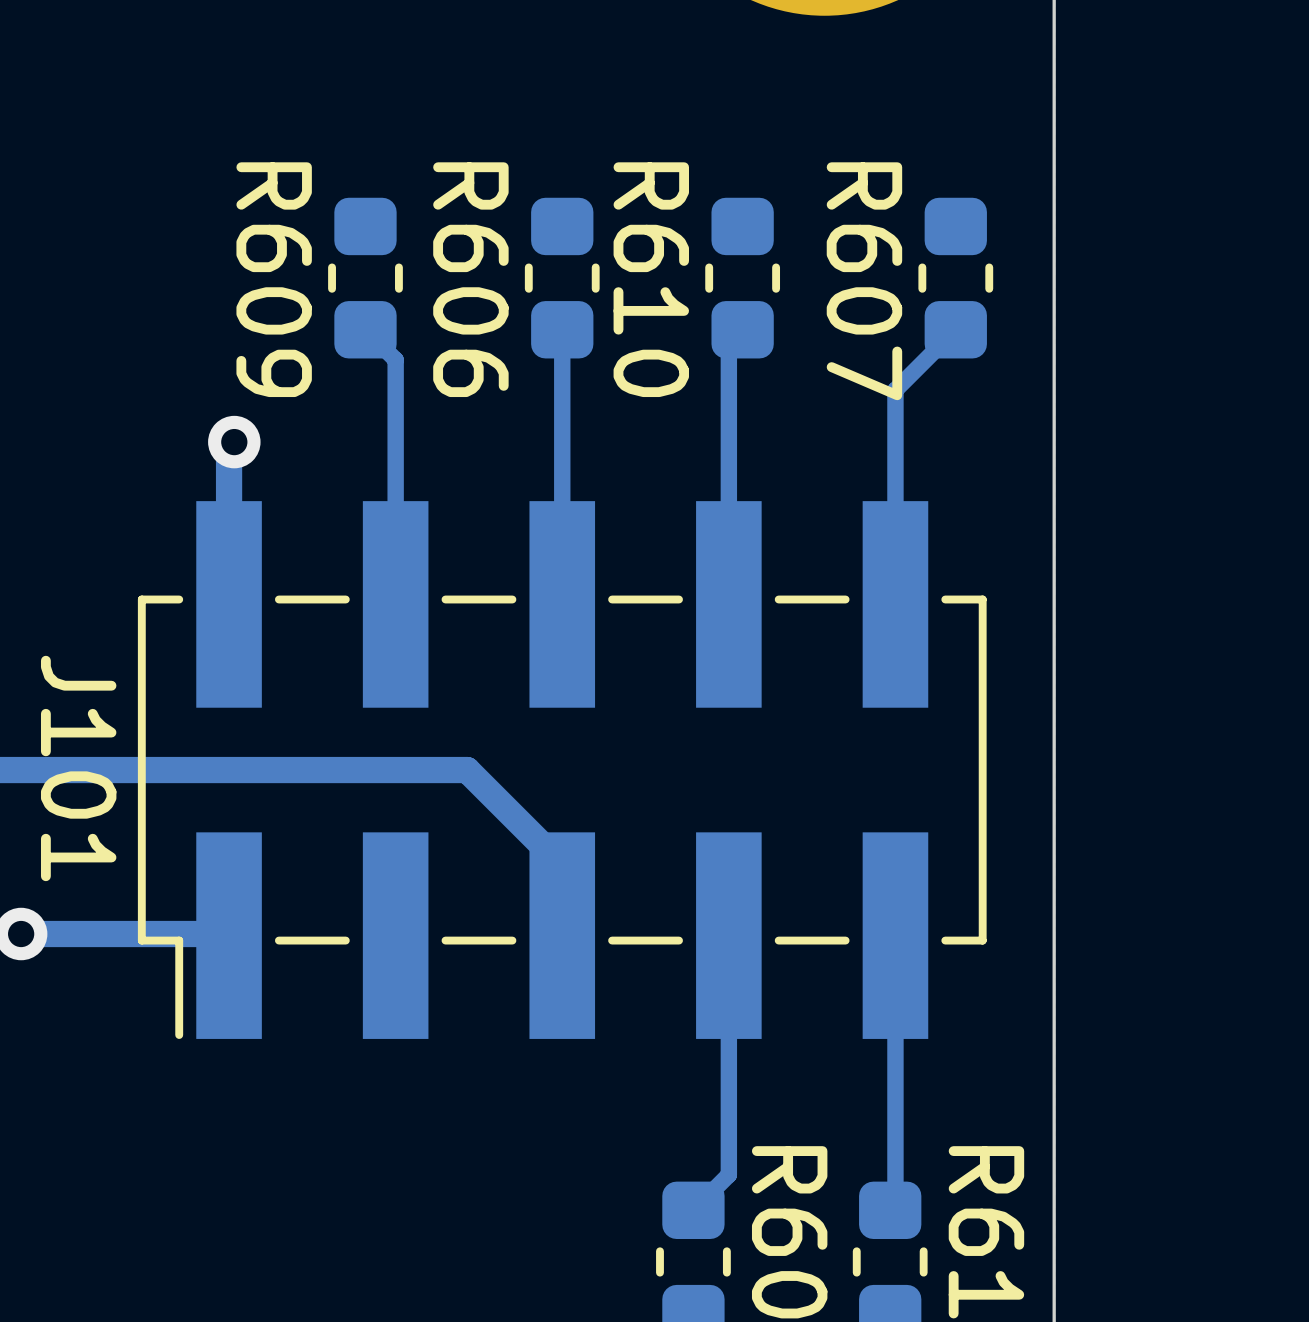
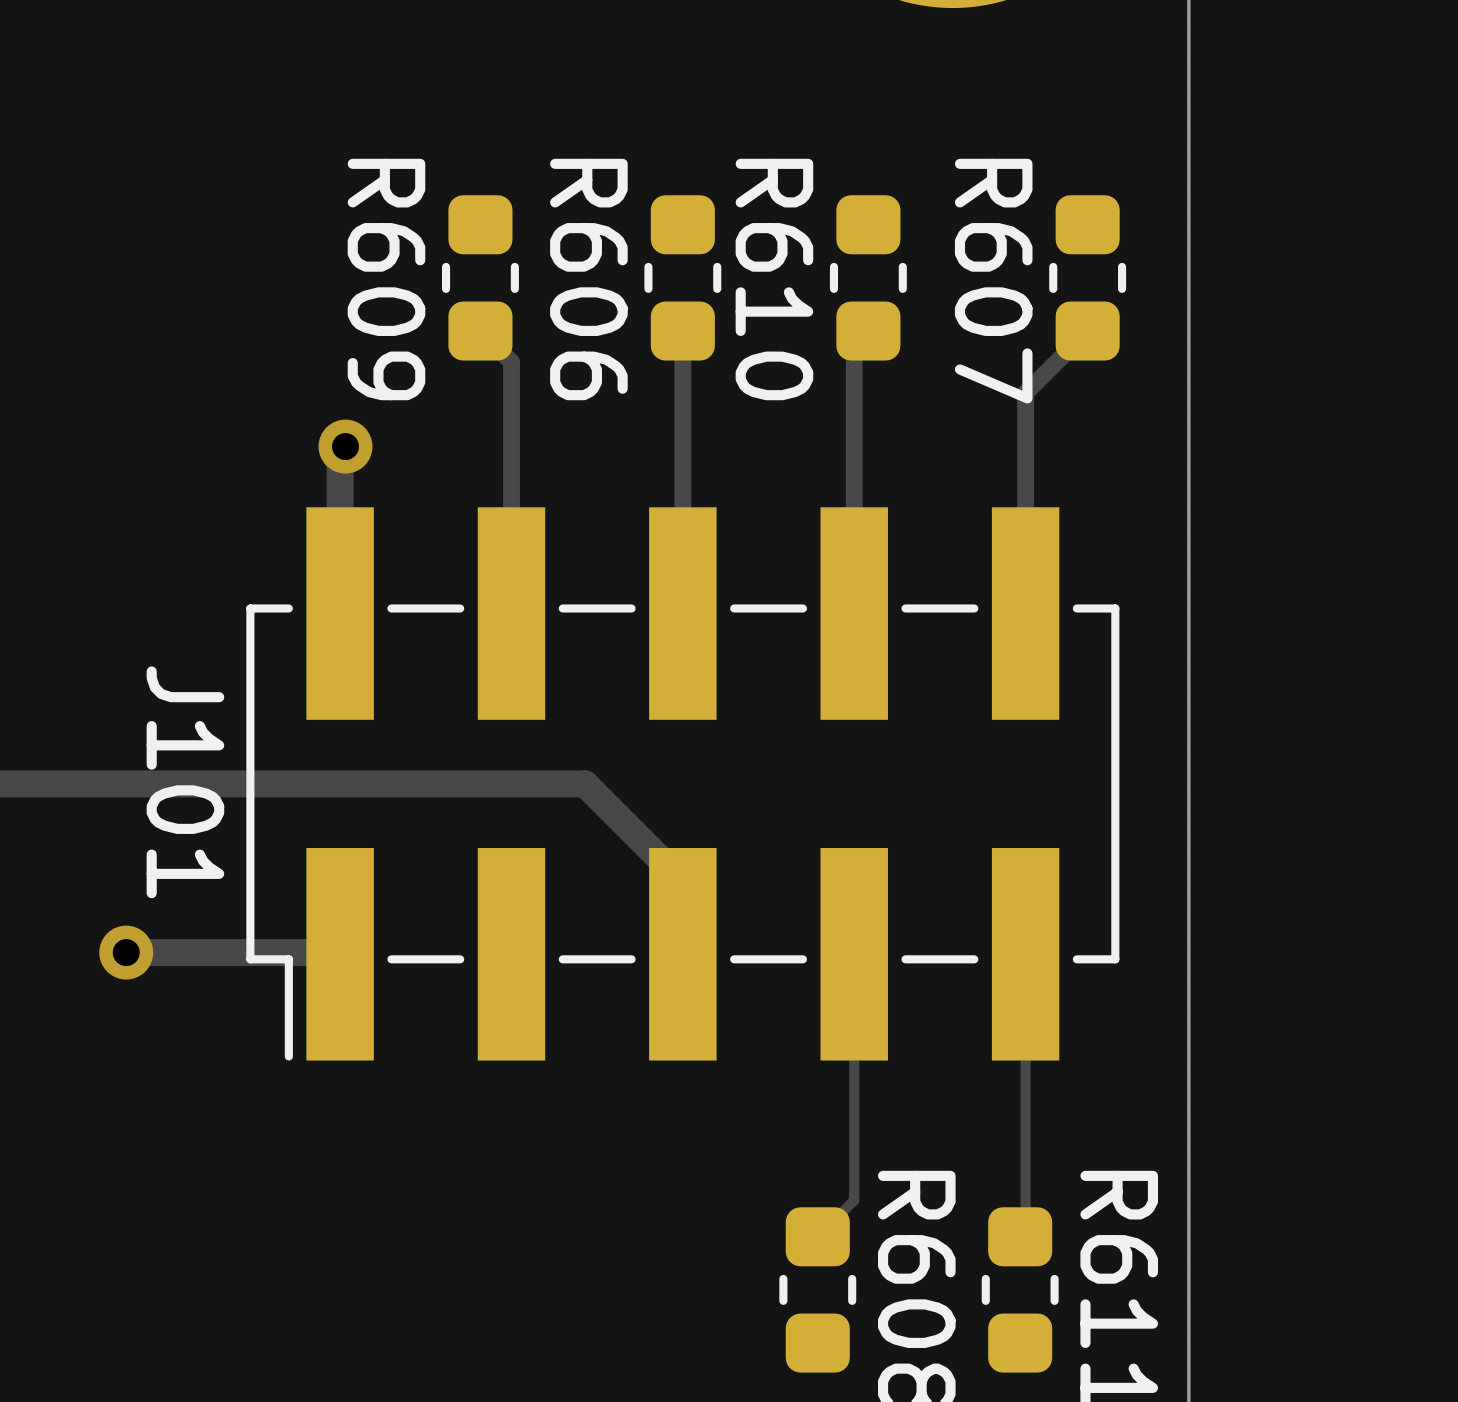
track width: thick (728, 935) (728, 1174) (693, 1210) -> thin (854, 954) (854, 1200) (817, 1236)
track width: thick (895, 935) (895, 1205) (890, 1210) -> thin (1025, 954) (1025, 1231) (1020, 1236)

